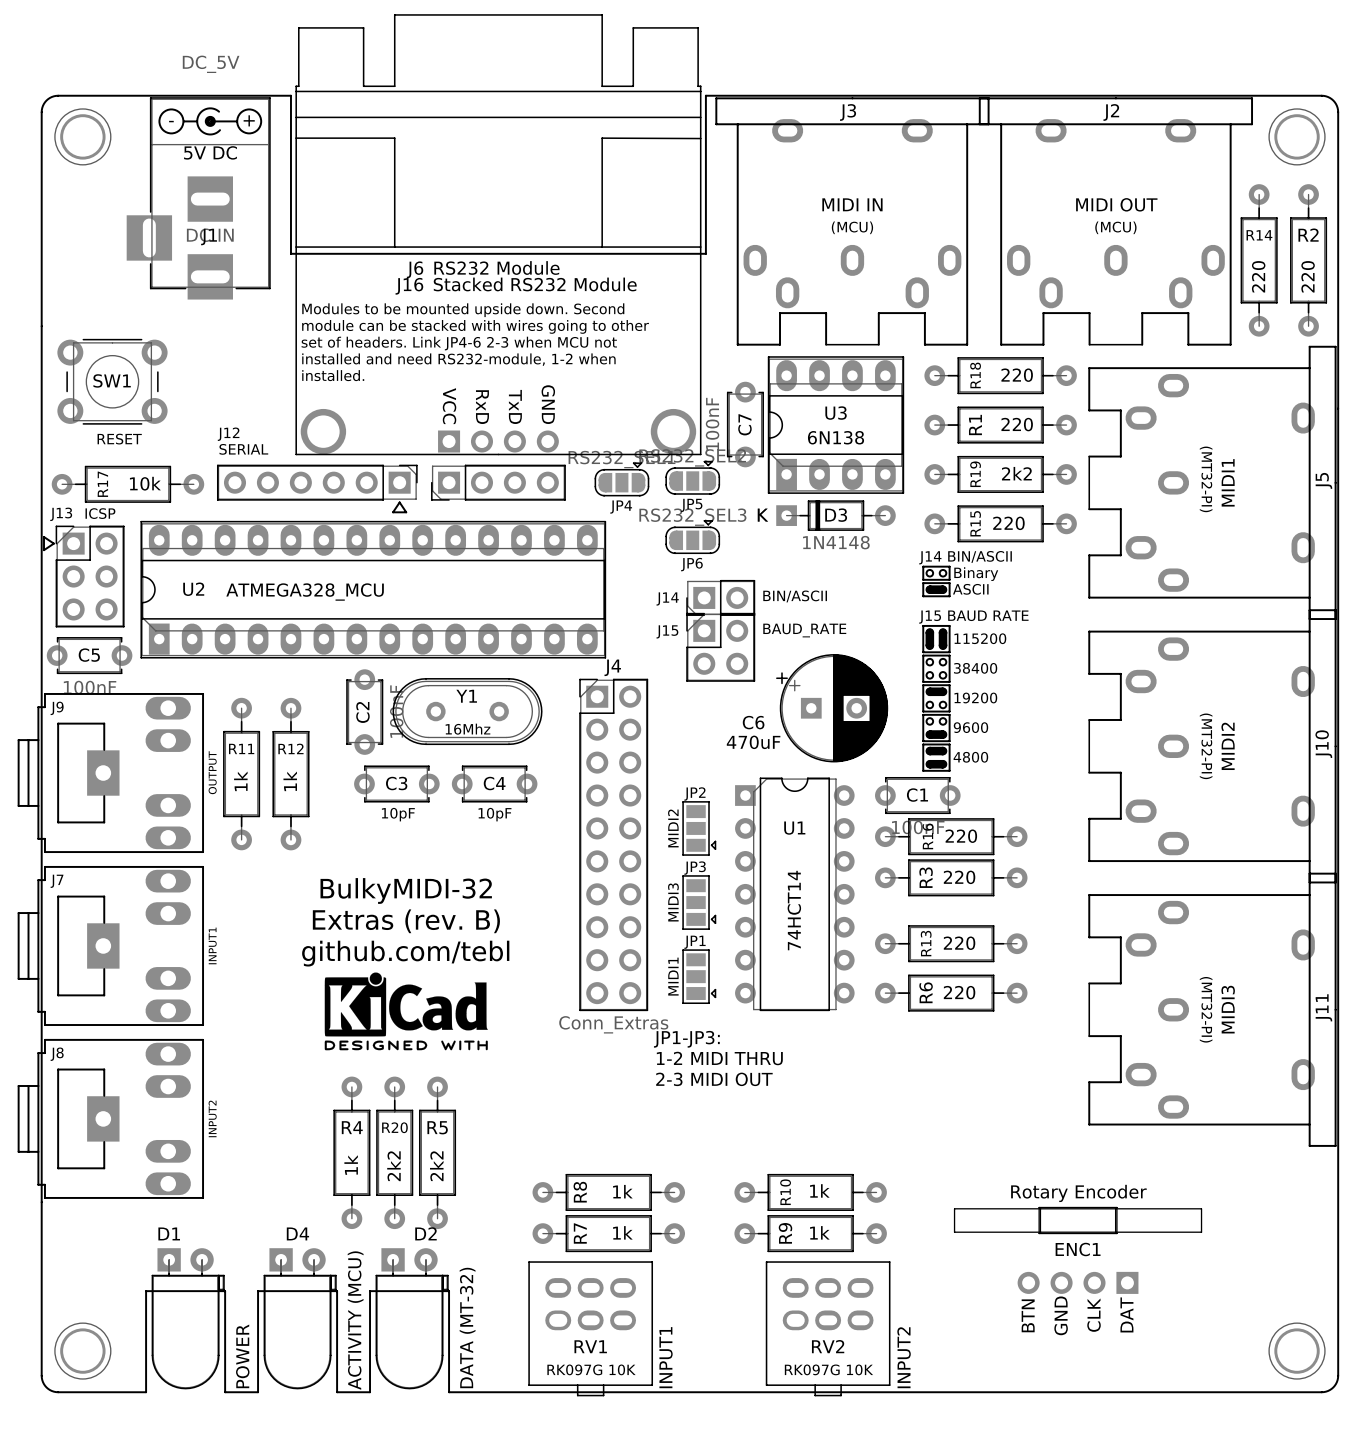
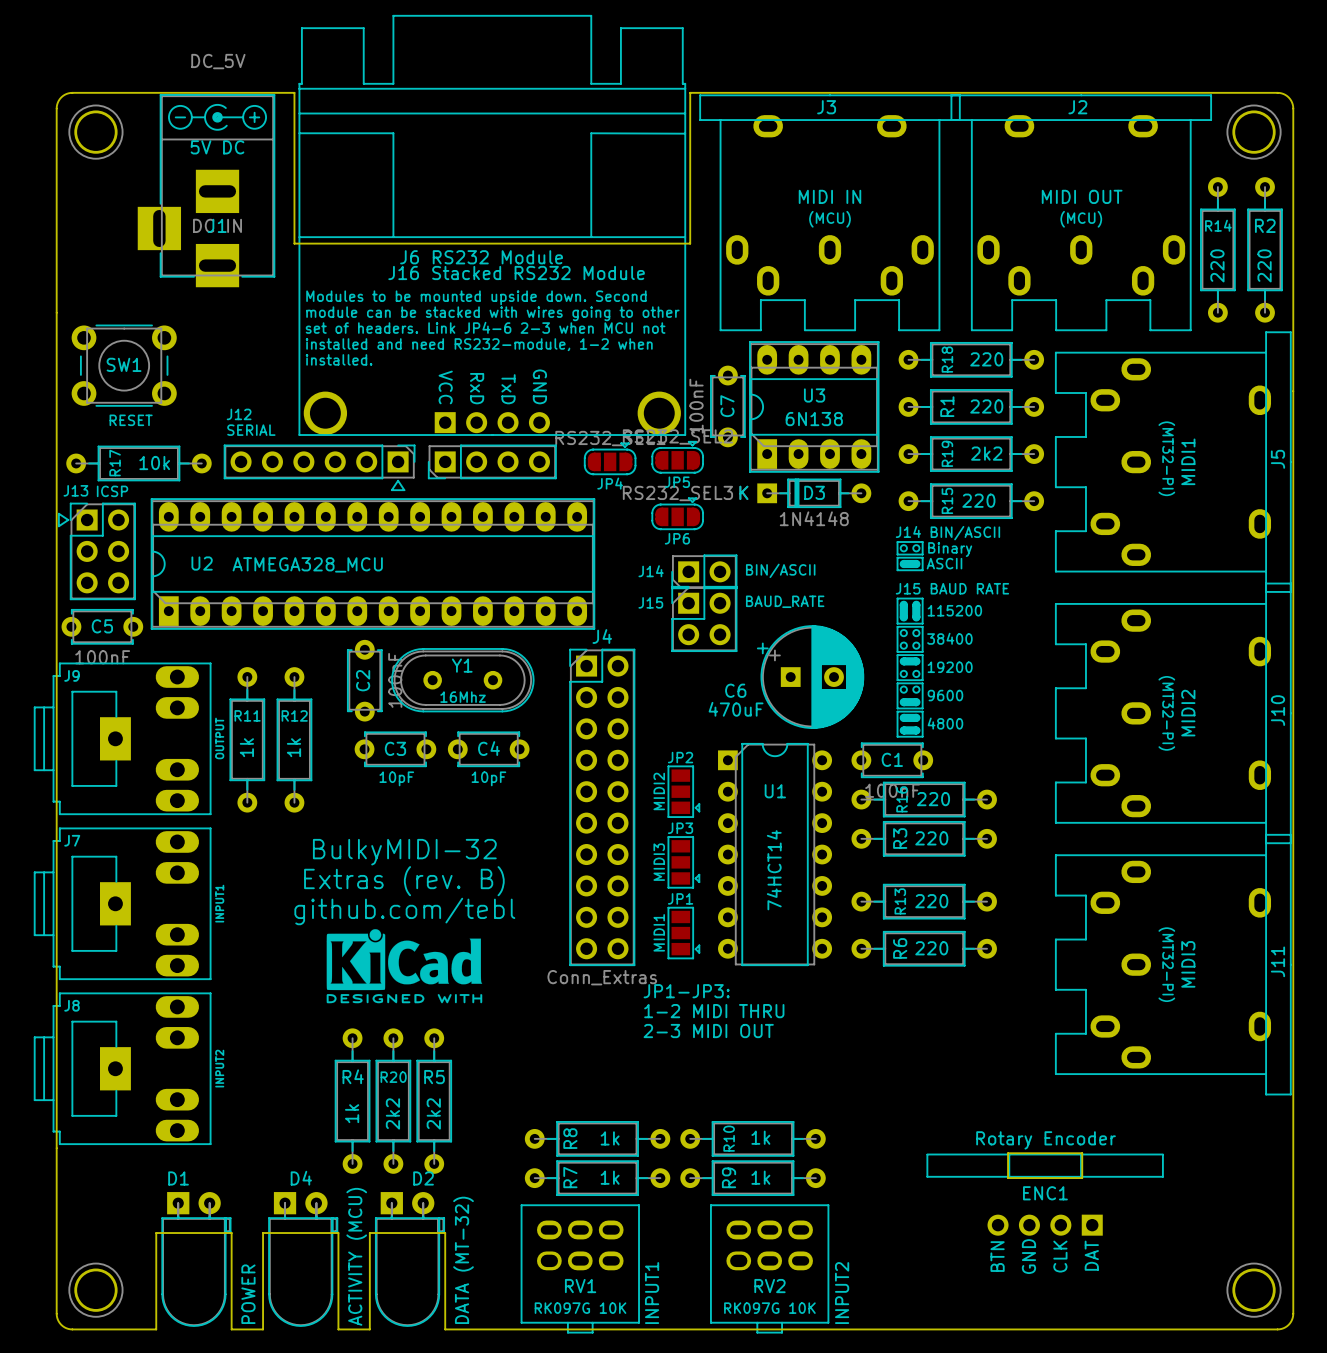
R10 position: (810, 1192) -> (753, 1138)
R9 position: (810, 1233) -> (753, 1178)
RV2 position: (828, 1328) -> (769, 1268)
text position: INPUT2 (904, 1357) -> INPUT2 (842, 1293)

